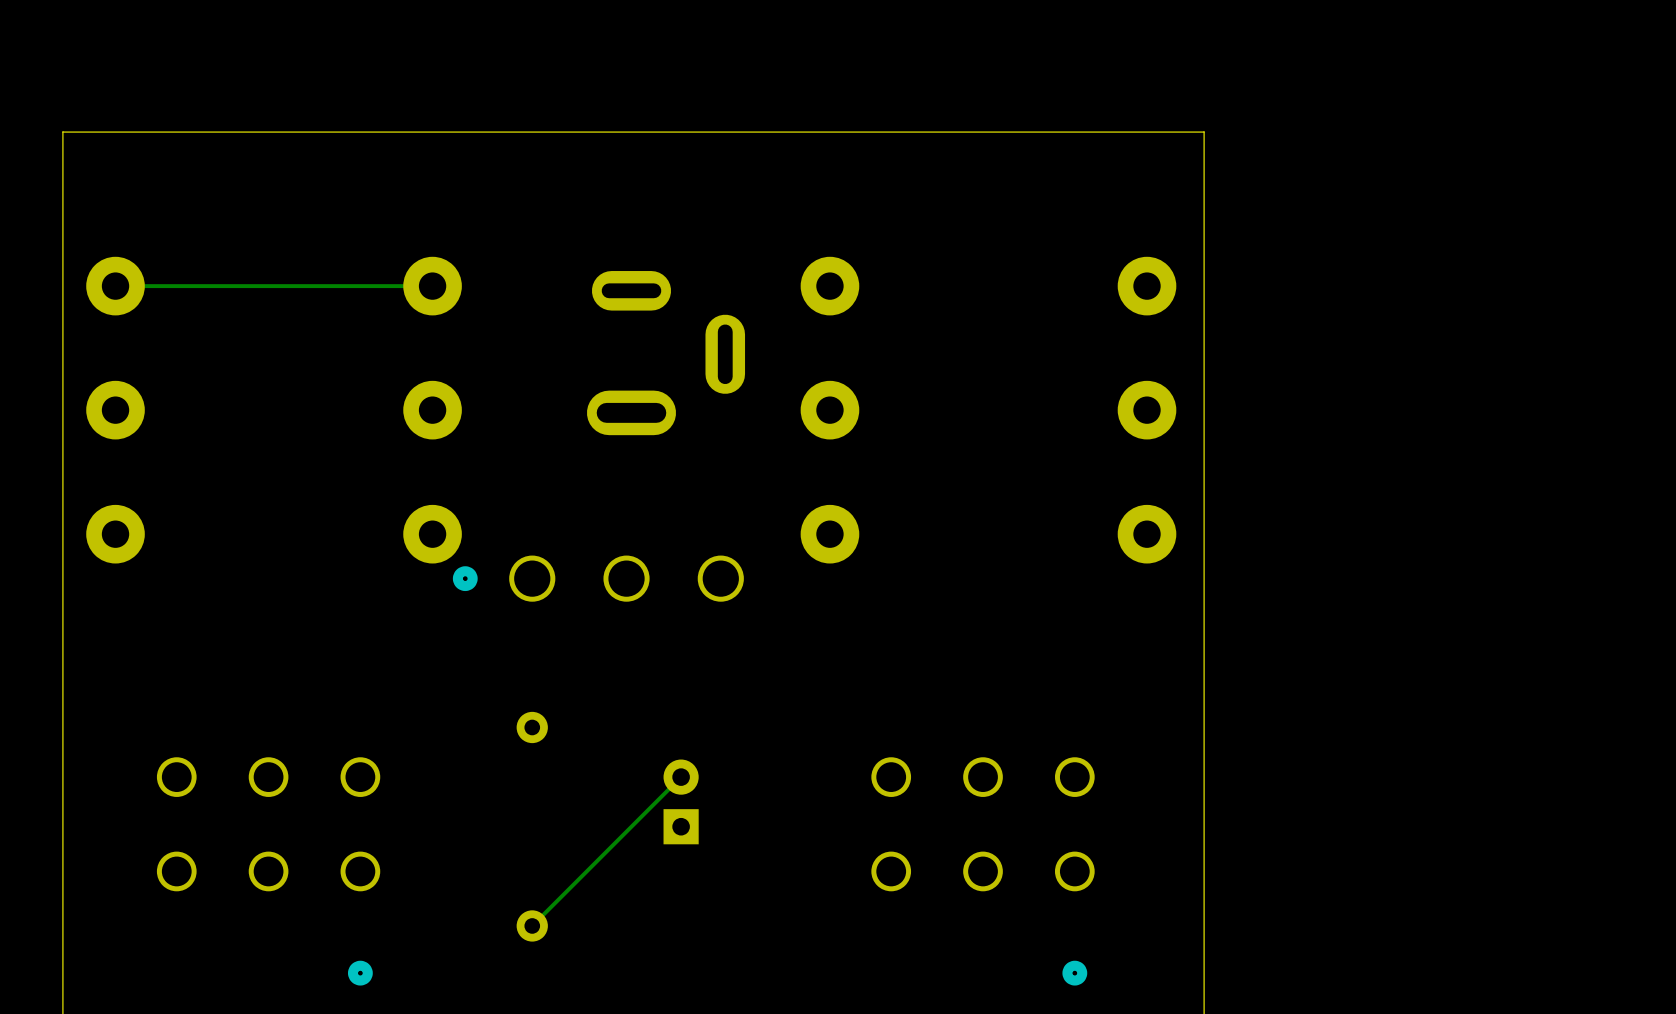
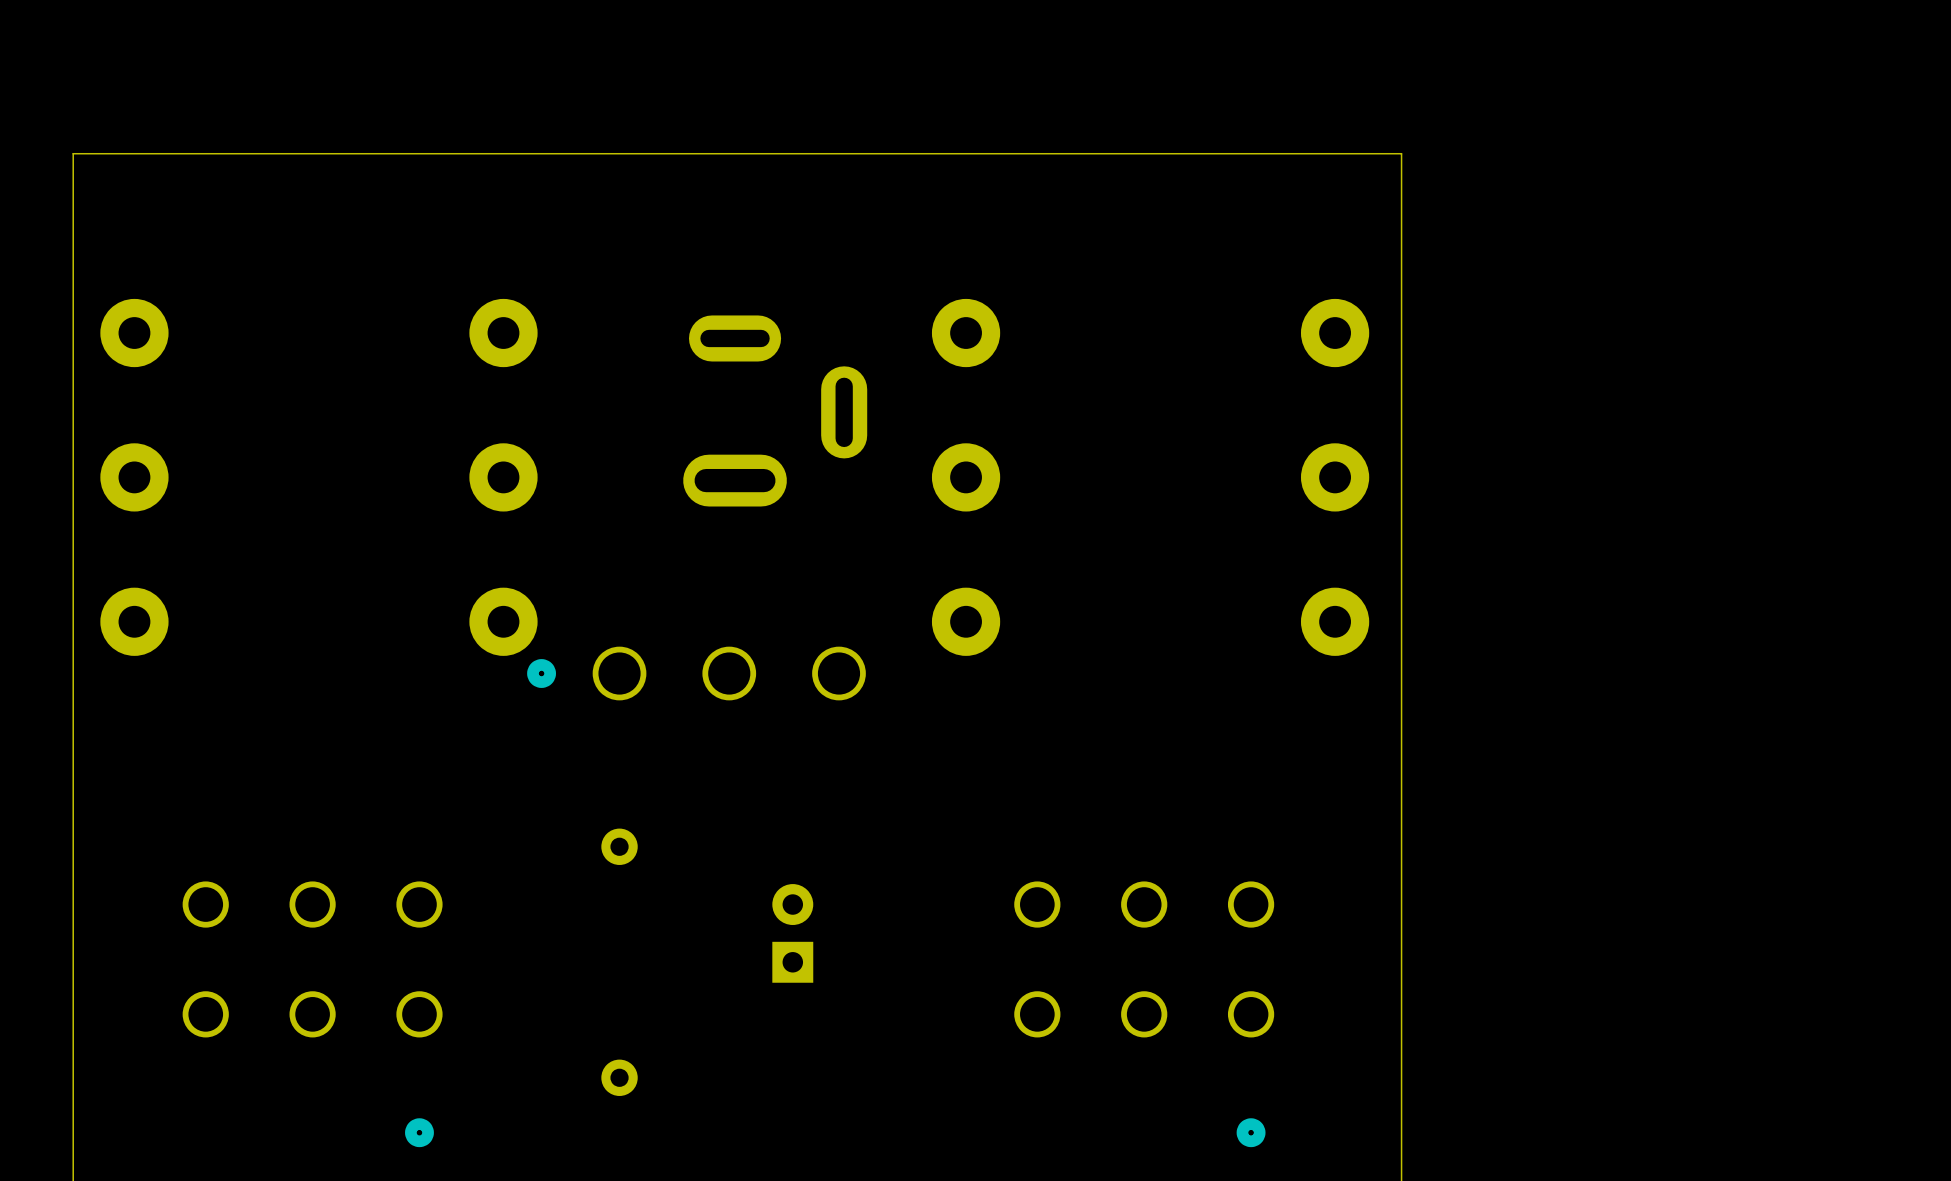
track: (432, 286) (115, 286) -> none
track: (681, 777) (532, 925) -> none

